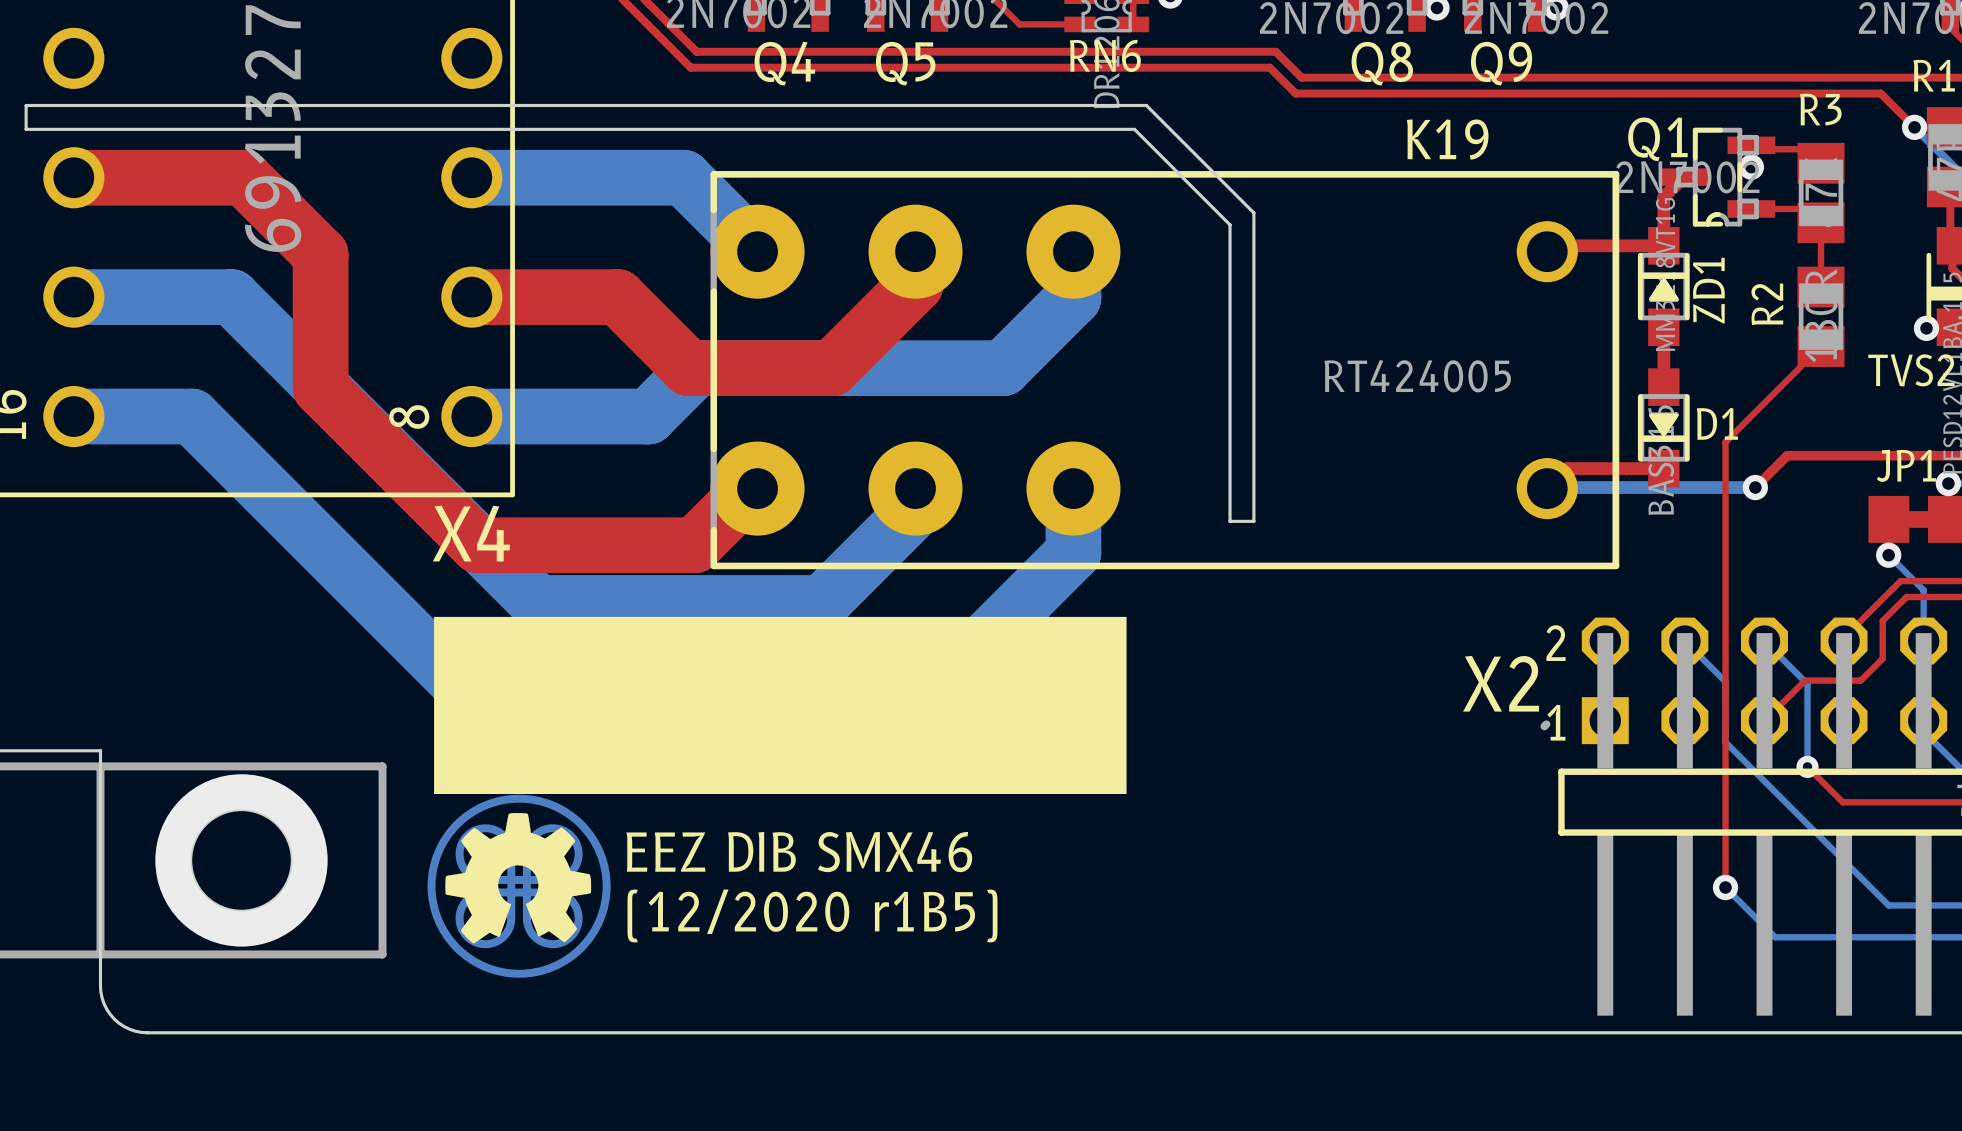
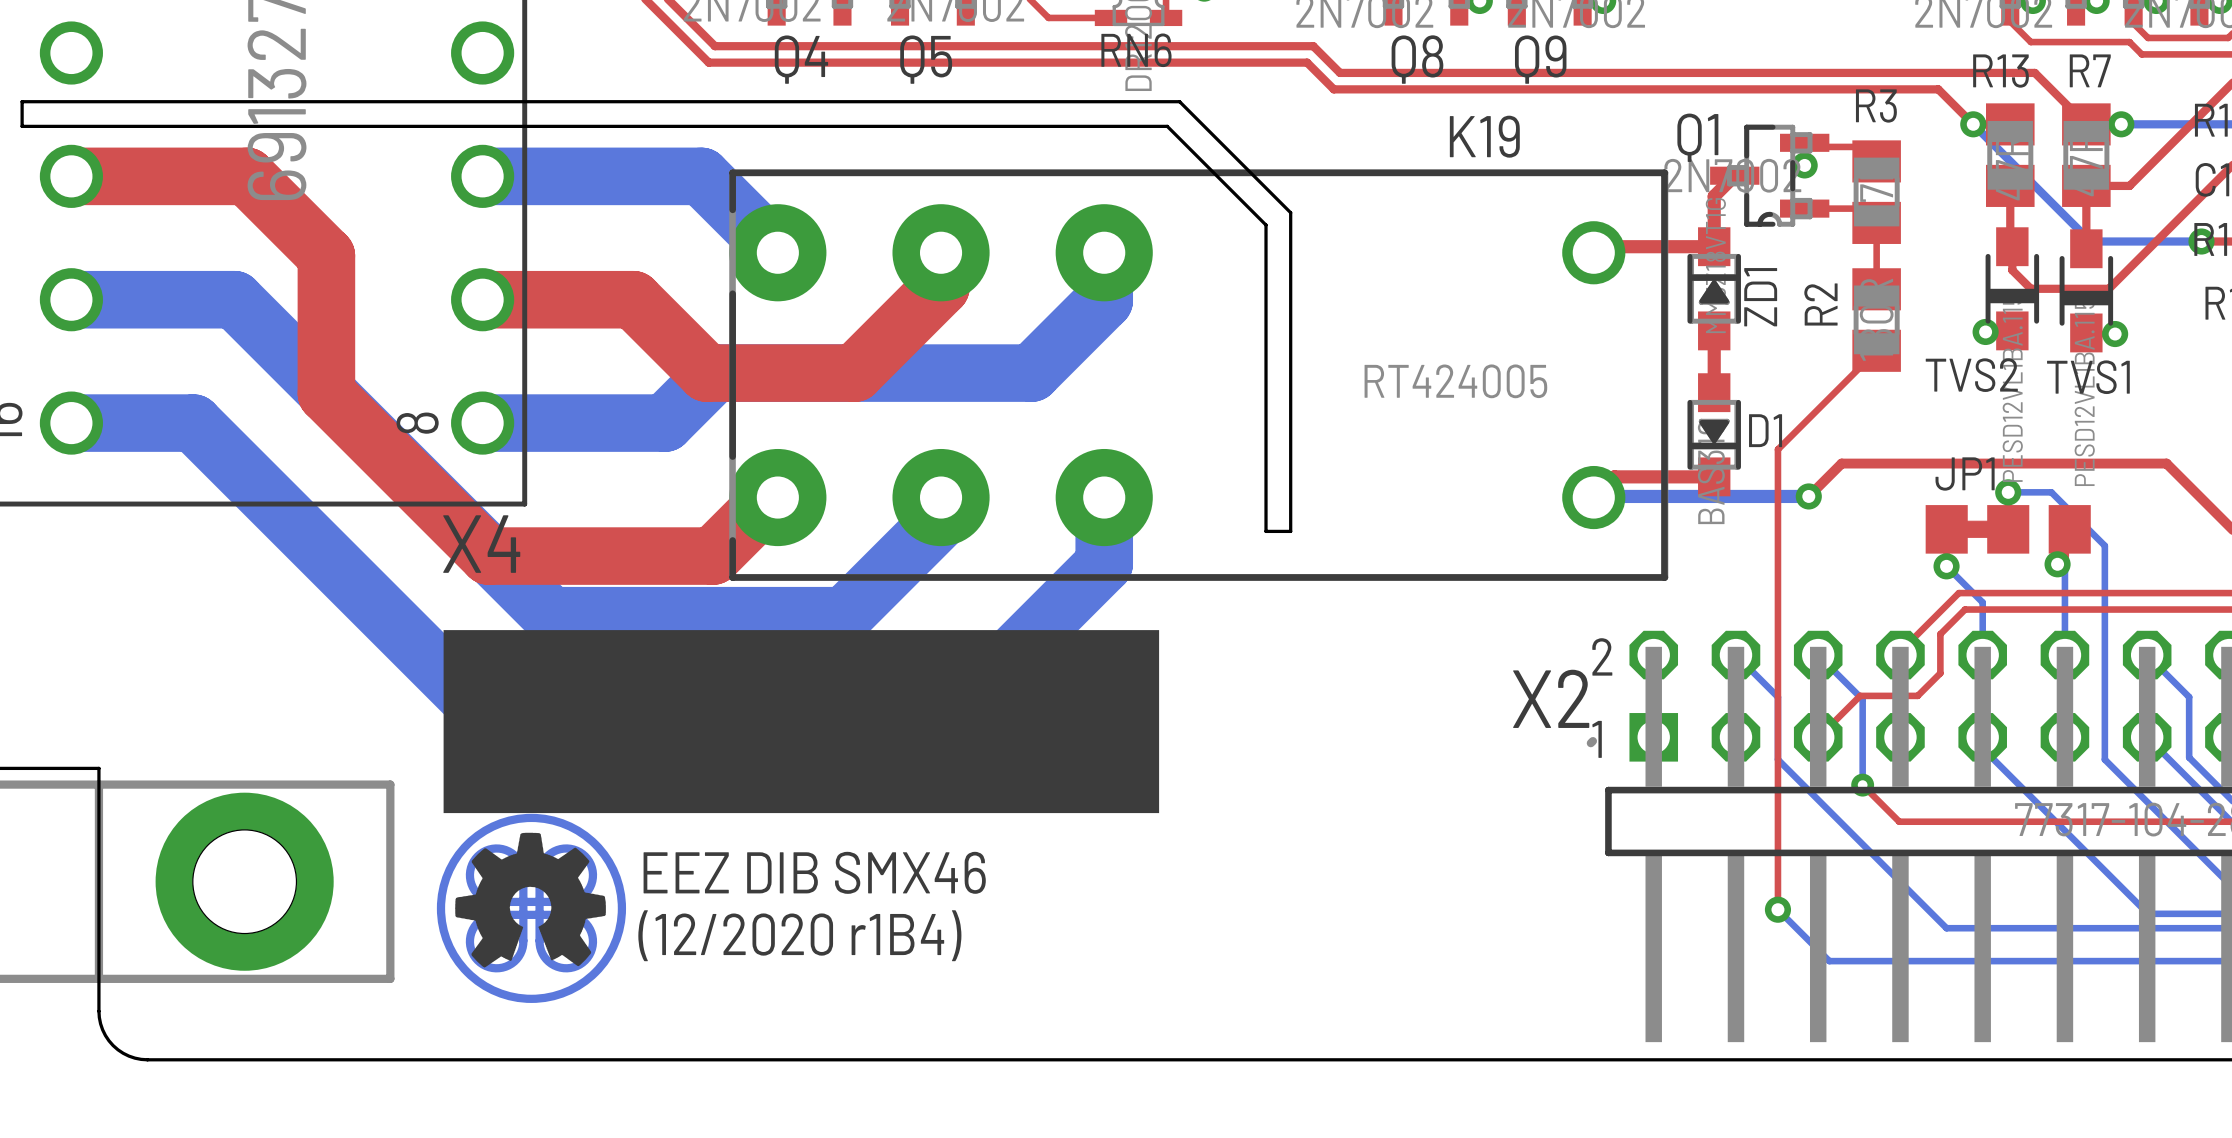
text: (12/2020 r1B5) (812, 915) -> (12/2020 r1B4) (799, 935)

